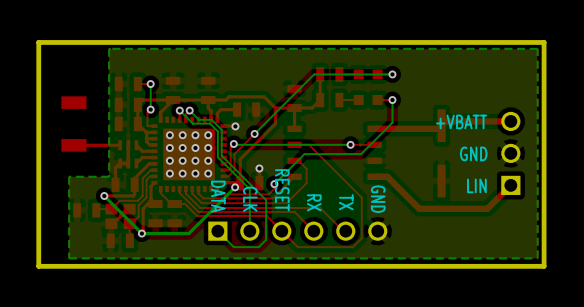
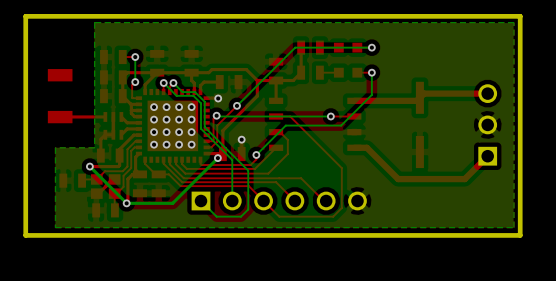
text: +VBATT (461, 121) -> none
text: GND (473, 153) -> none
text: LIN (476, 185) -> none
text: RESET (282, 190) -> none
text: DATA (218, 196) -> none
text: CLK (250, 199) -> none
text: GND (378, 199) -> none
text: RX (314, 202) -> none
text: TX (346, 202) -> none

